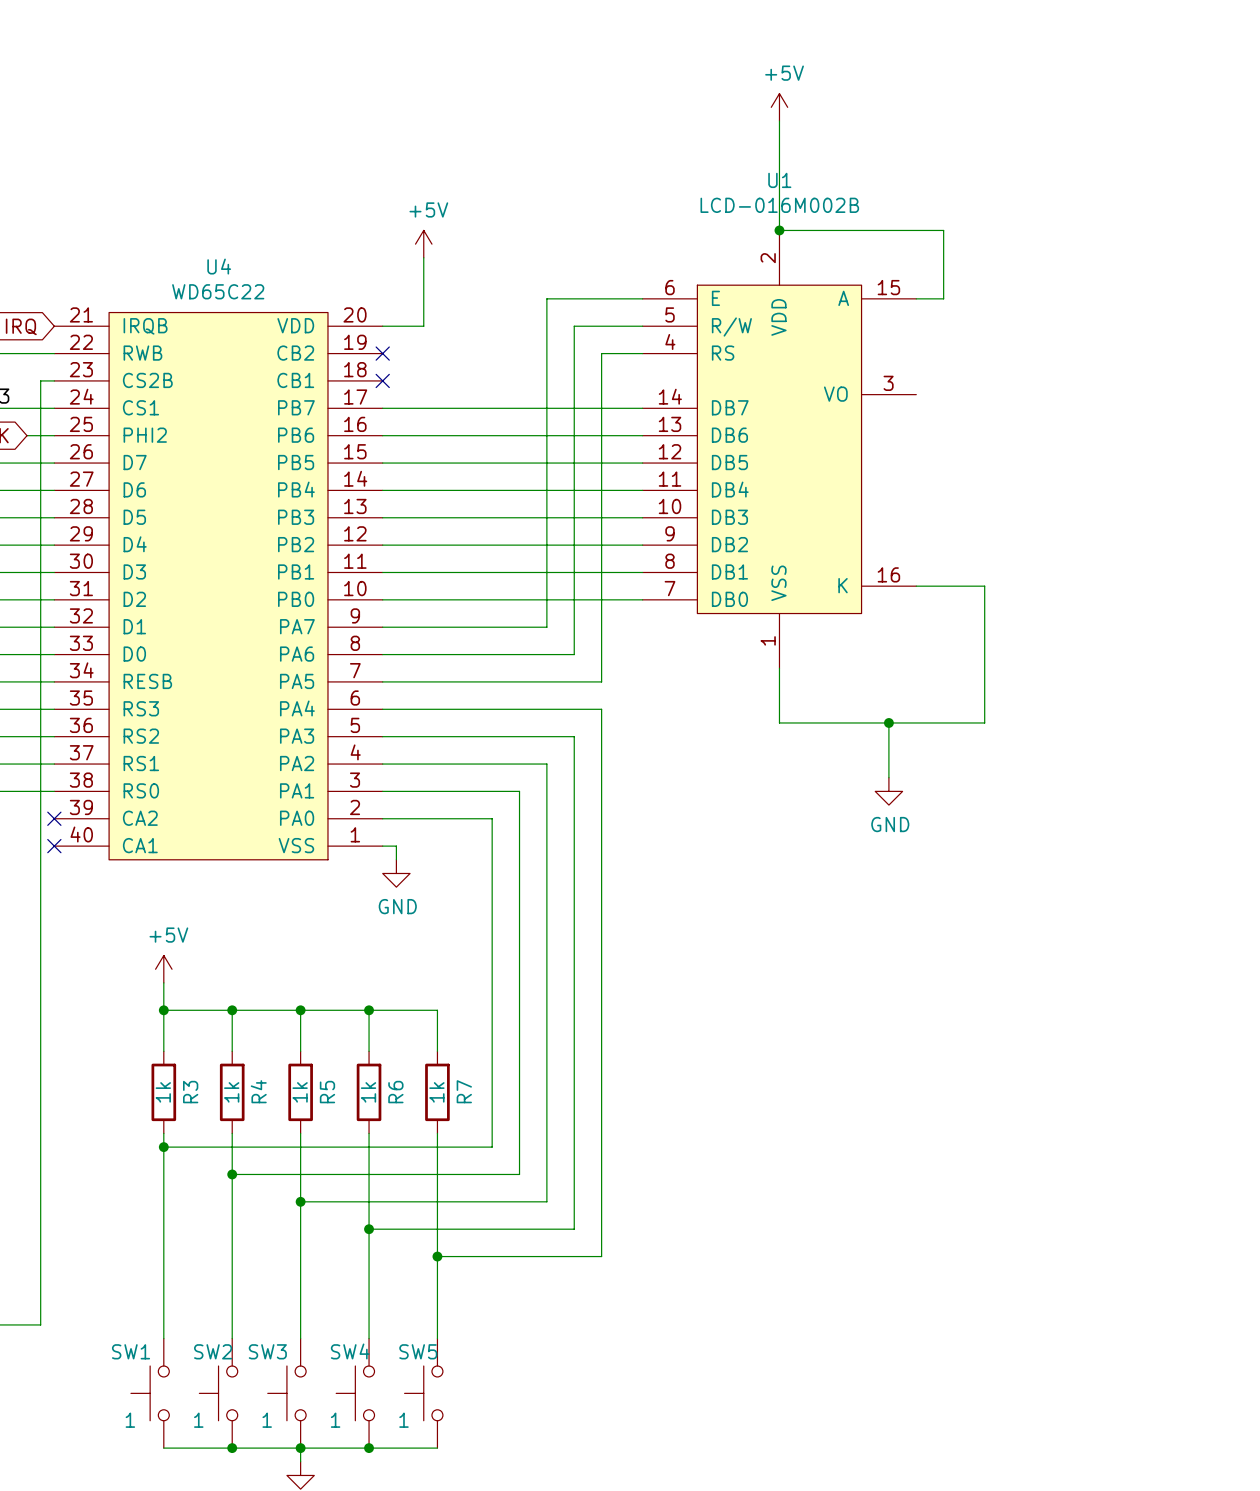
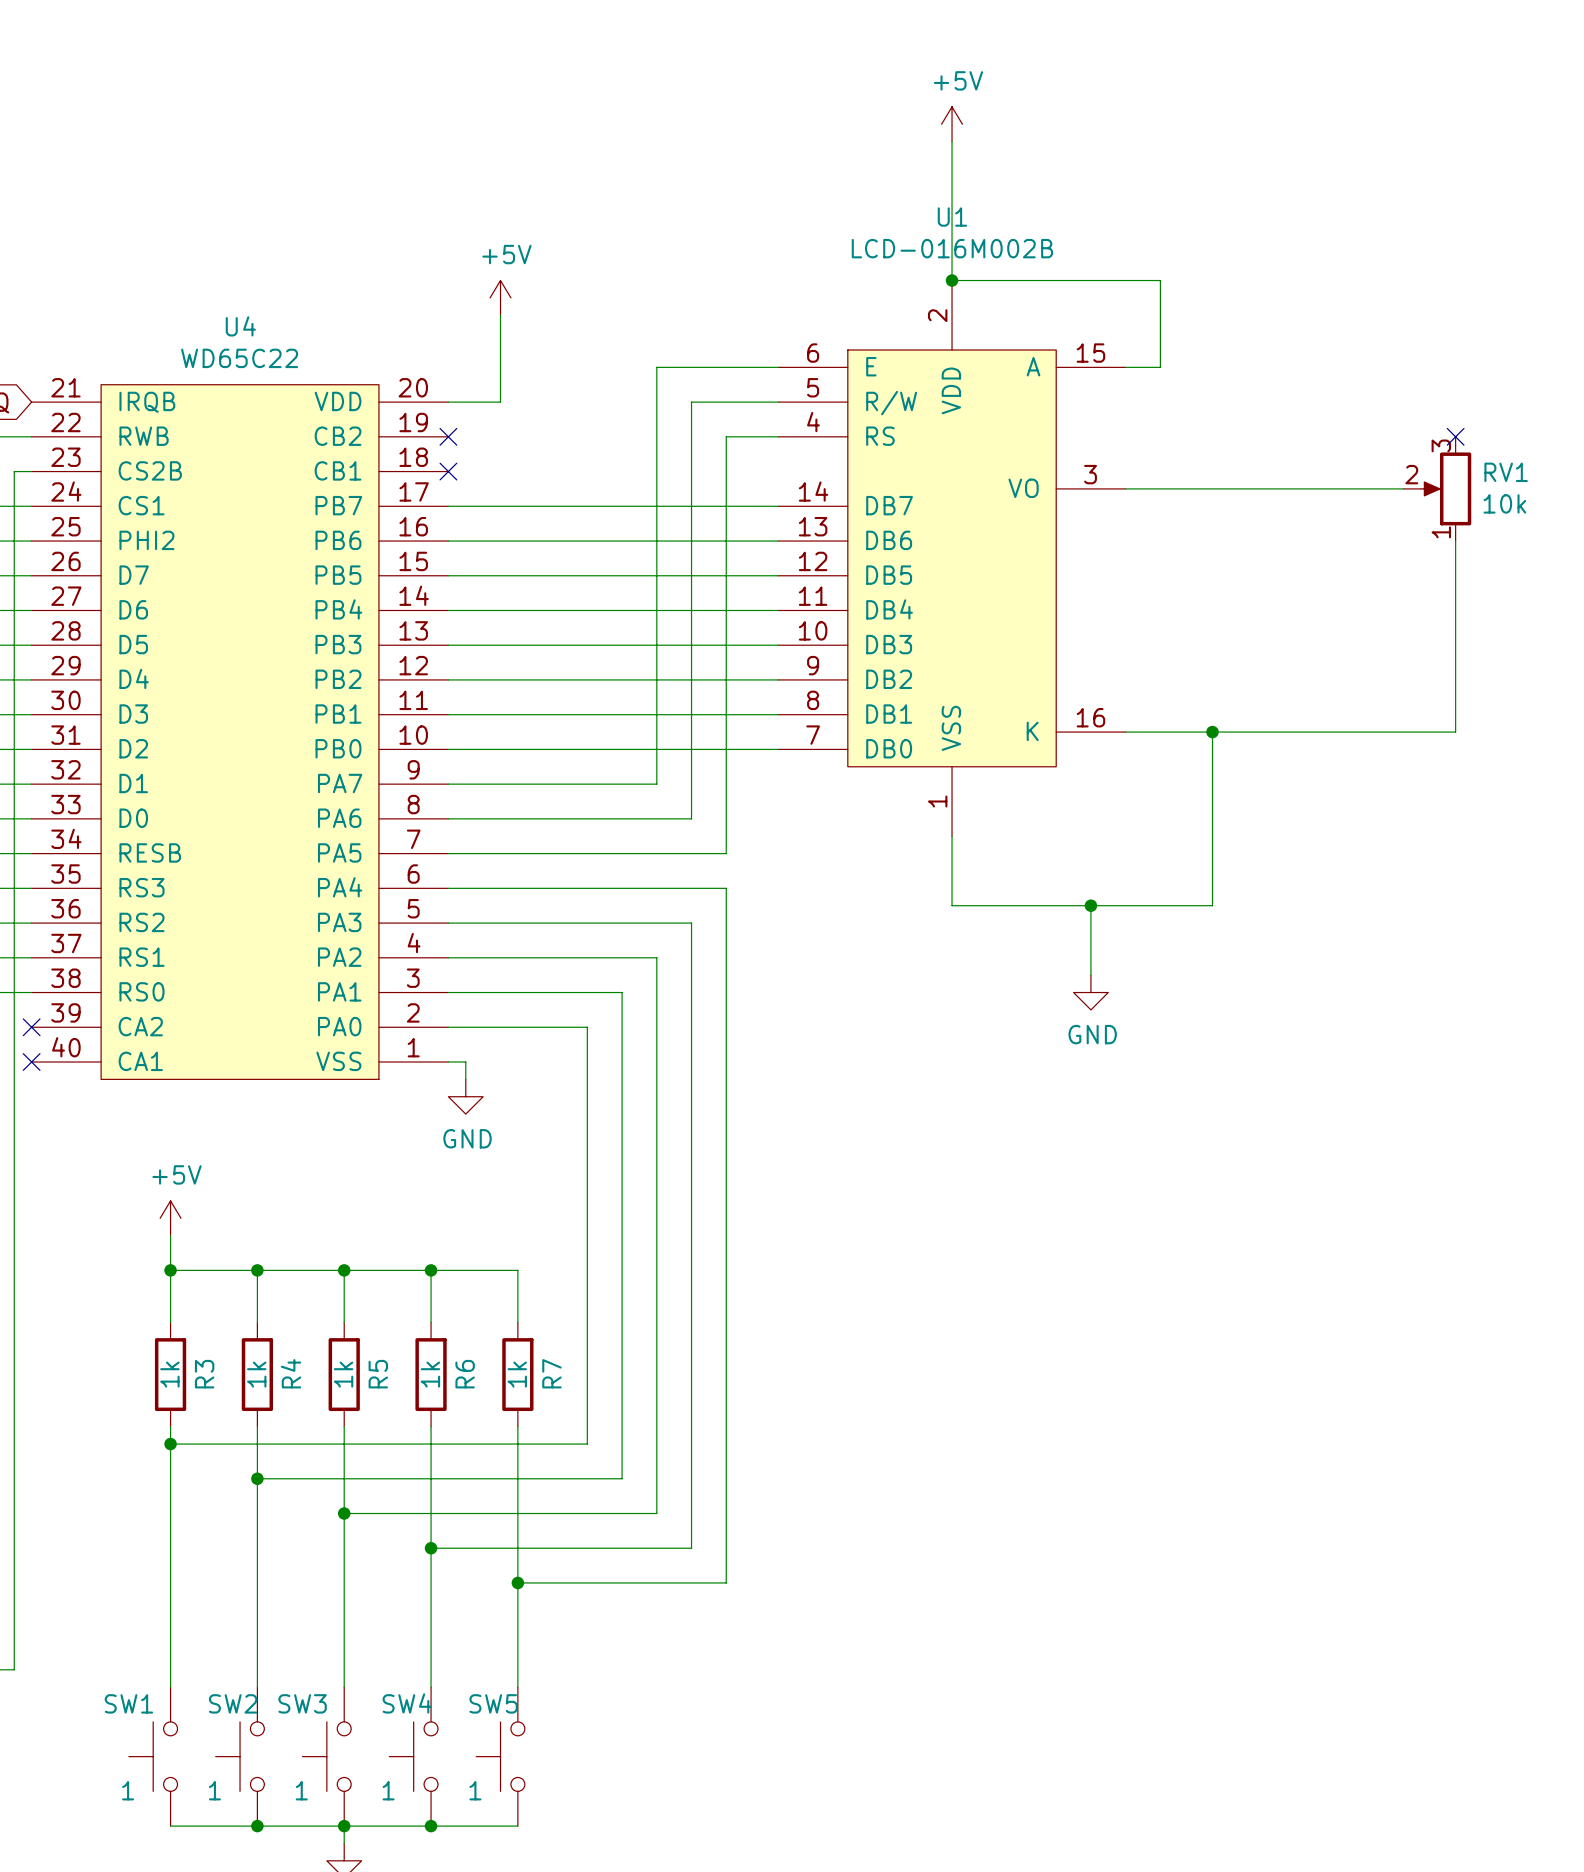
no-connect mark: none -> (1455, 436)
wire: none -> (1125, 488) (1403, 488)
RV1: none -> 10k (1437, 488)
wire: none -> (1455, 541) (1455, 732) (1212, 732)
junction: none -> (1212, 732)

